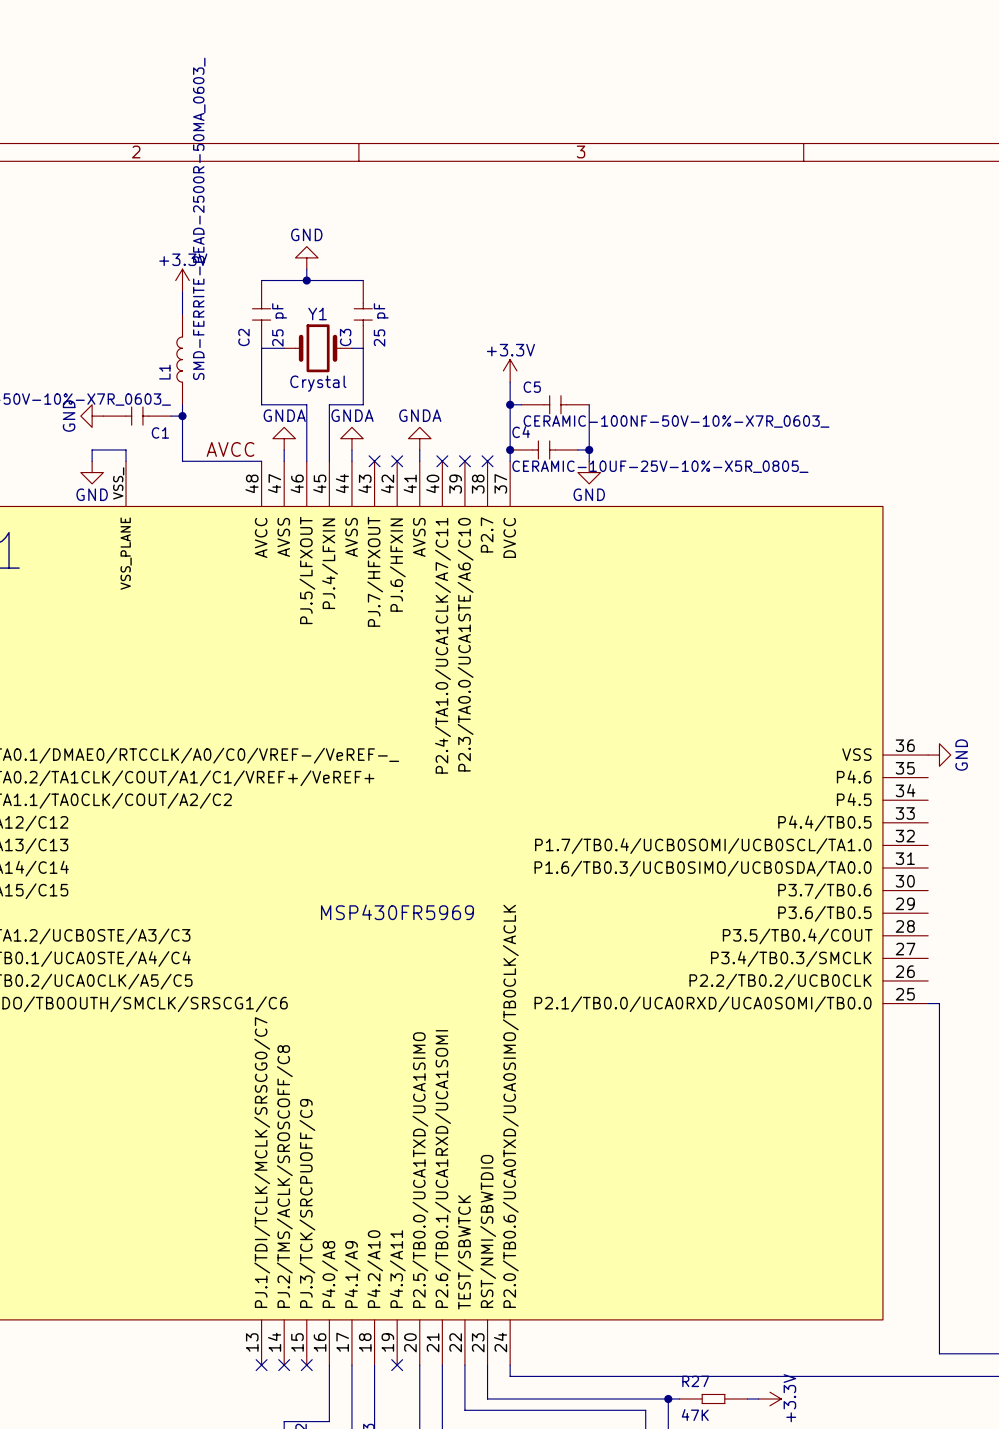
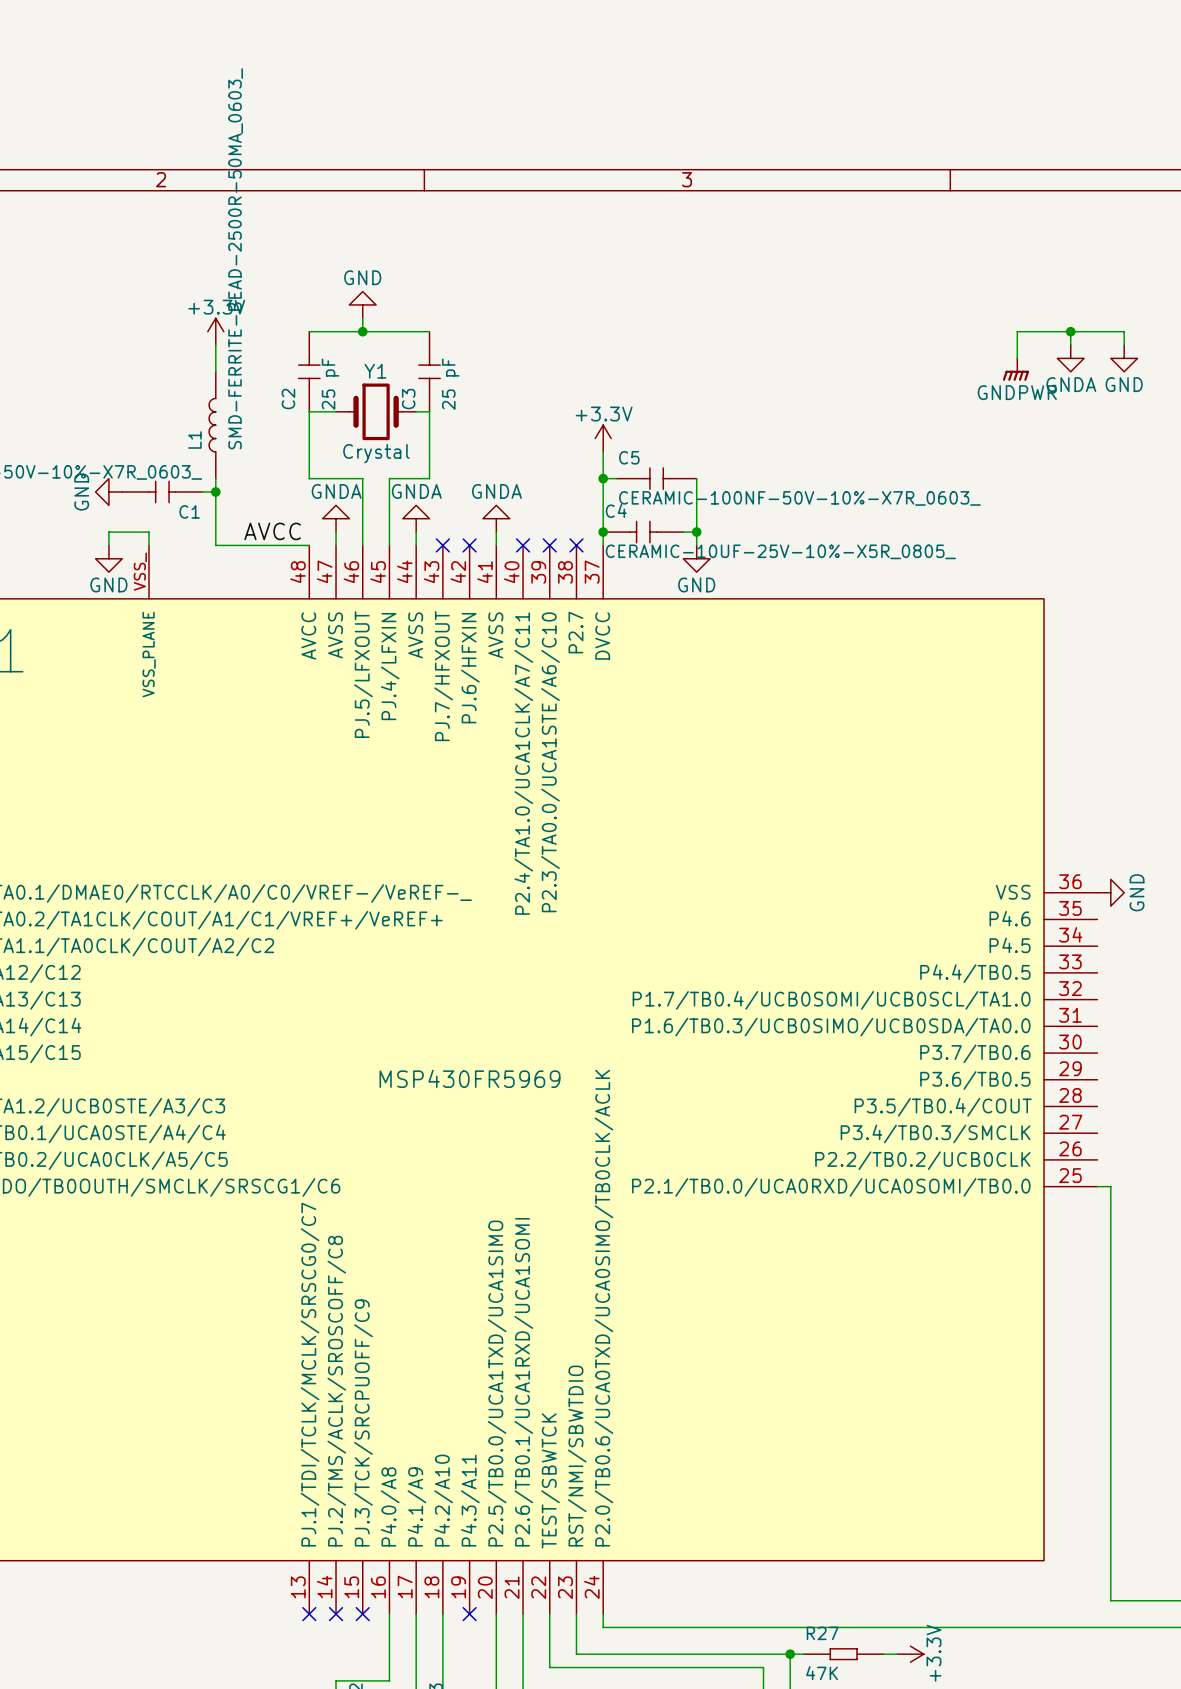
wire: none -> (1070, 331) (1070, 345)
junction: none -> (1070, 331)
wire: none -> (1124, 345) (1124, 331) (1017, 331) (1017, 358)
power symbol: none -> GNDA (1070, 358)
power symbol: none -> GND (1124, 358)
power symbol: none -> GNDPWR (1015, 369)

